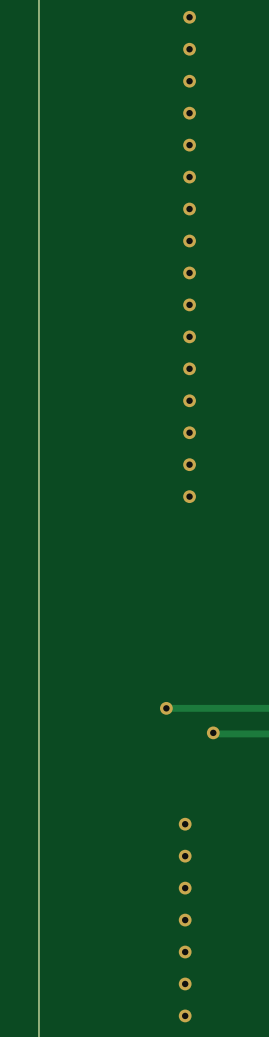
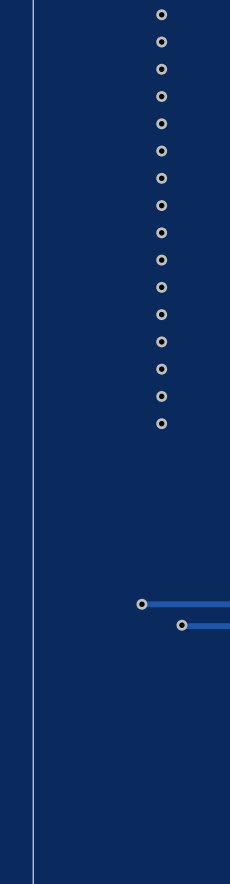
via: (185, 824) -> none
via: (185, 856) -> none
via: (185, 888) -> none
via: (185, 920) -> none
via: (185, 952) -> none
via: (185, 983) -> none
via: (185, 1015) -> none

